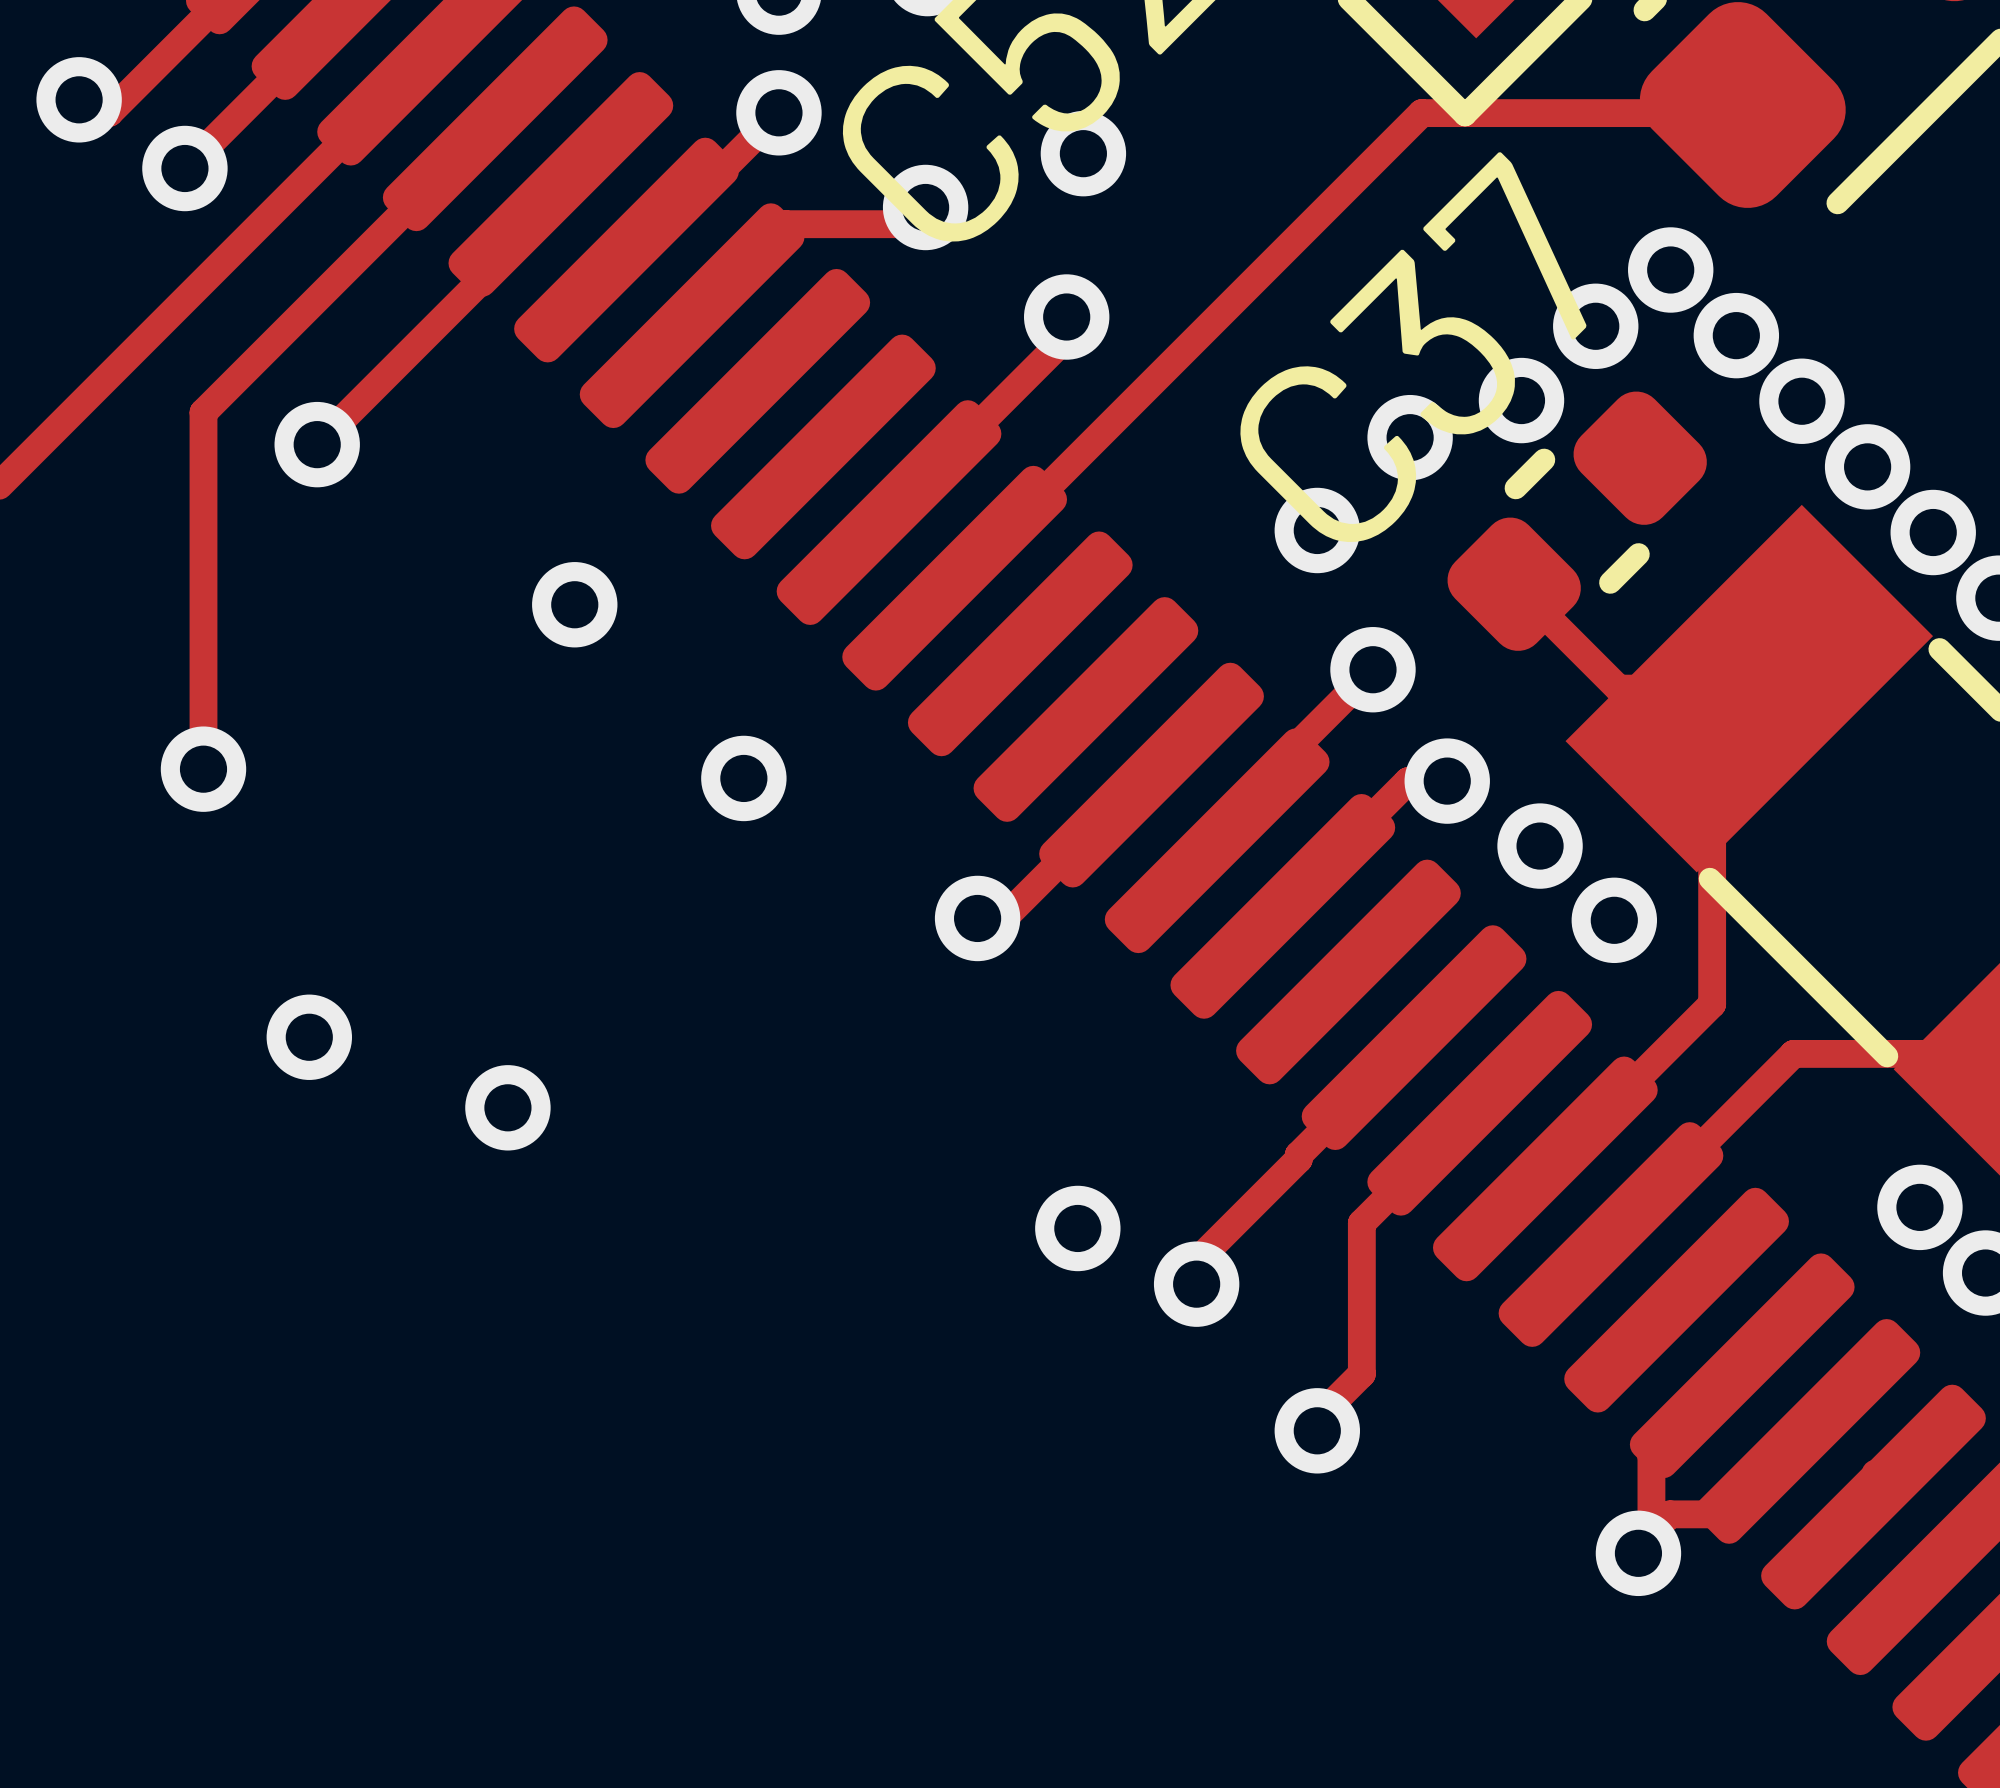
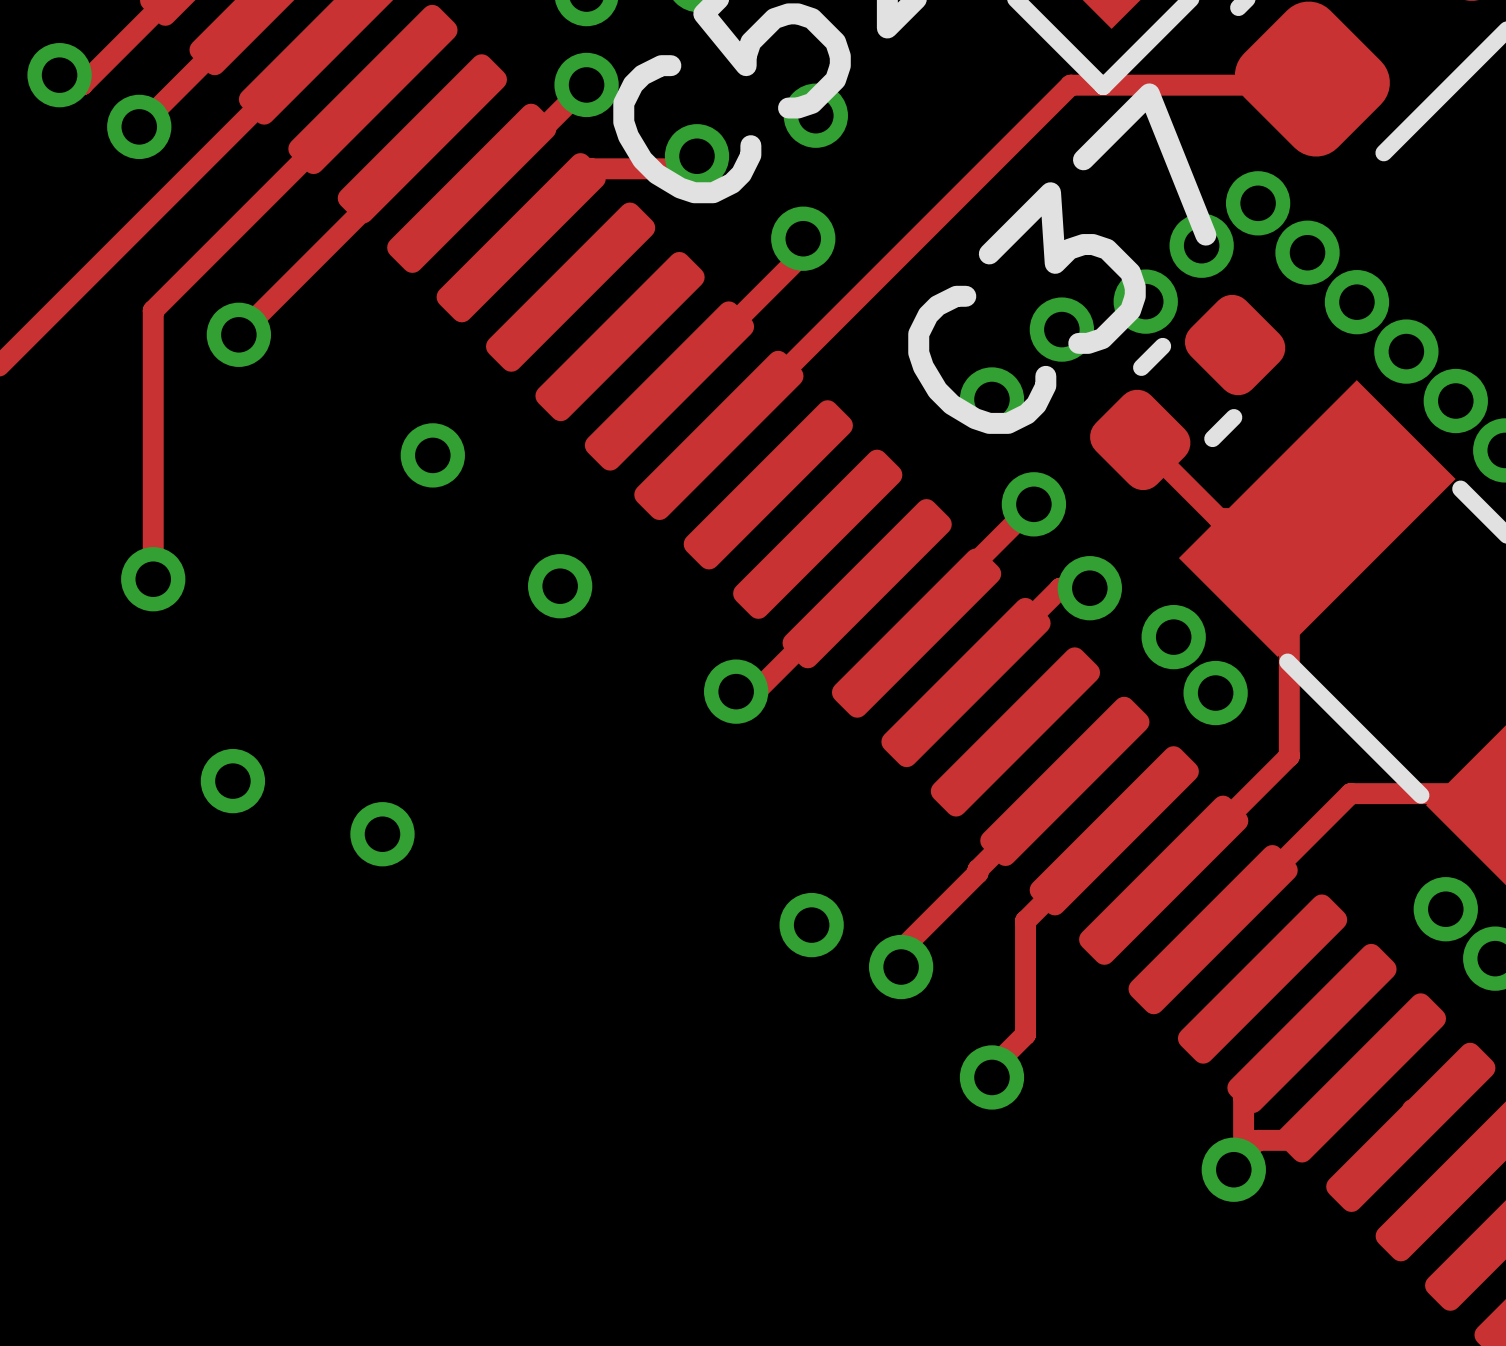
via position: (1540, 846) -> (1173, 637)

